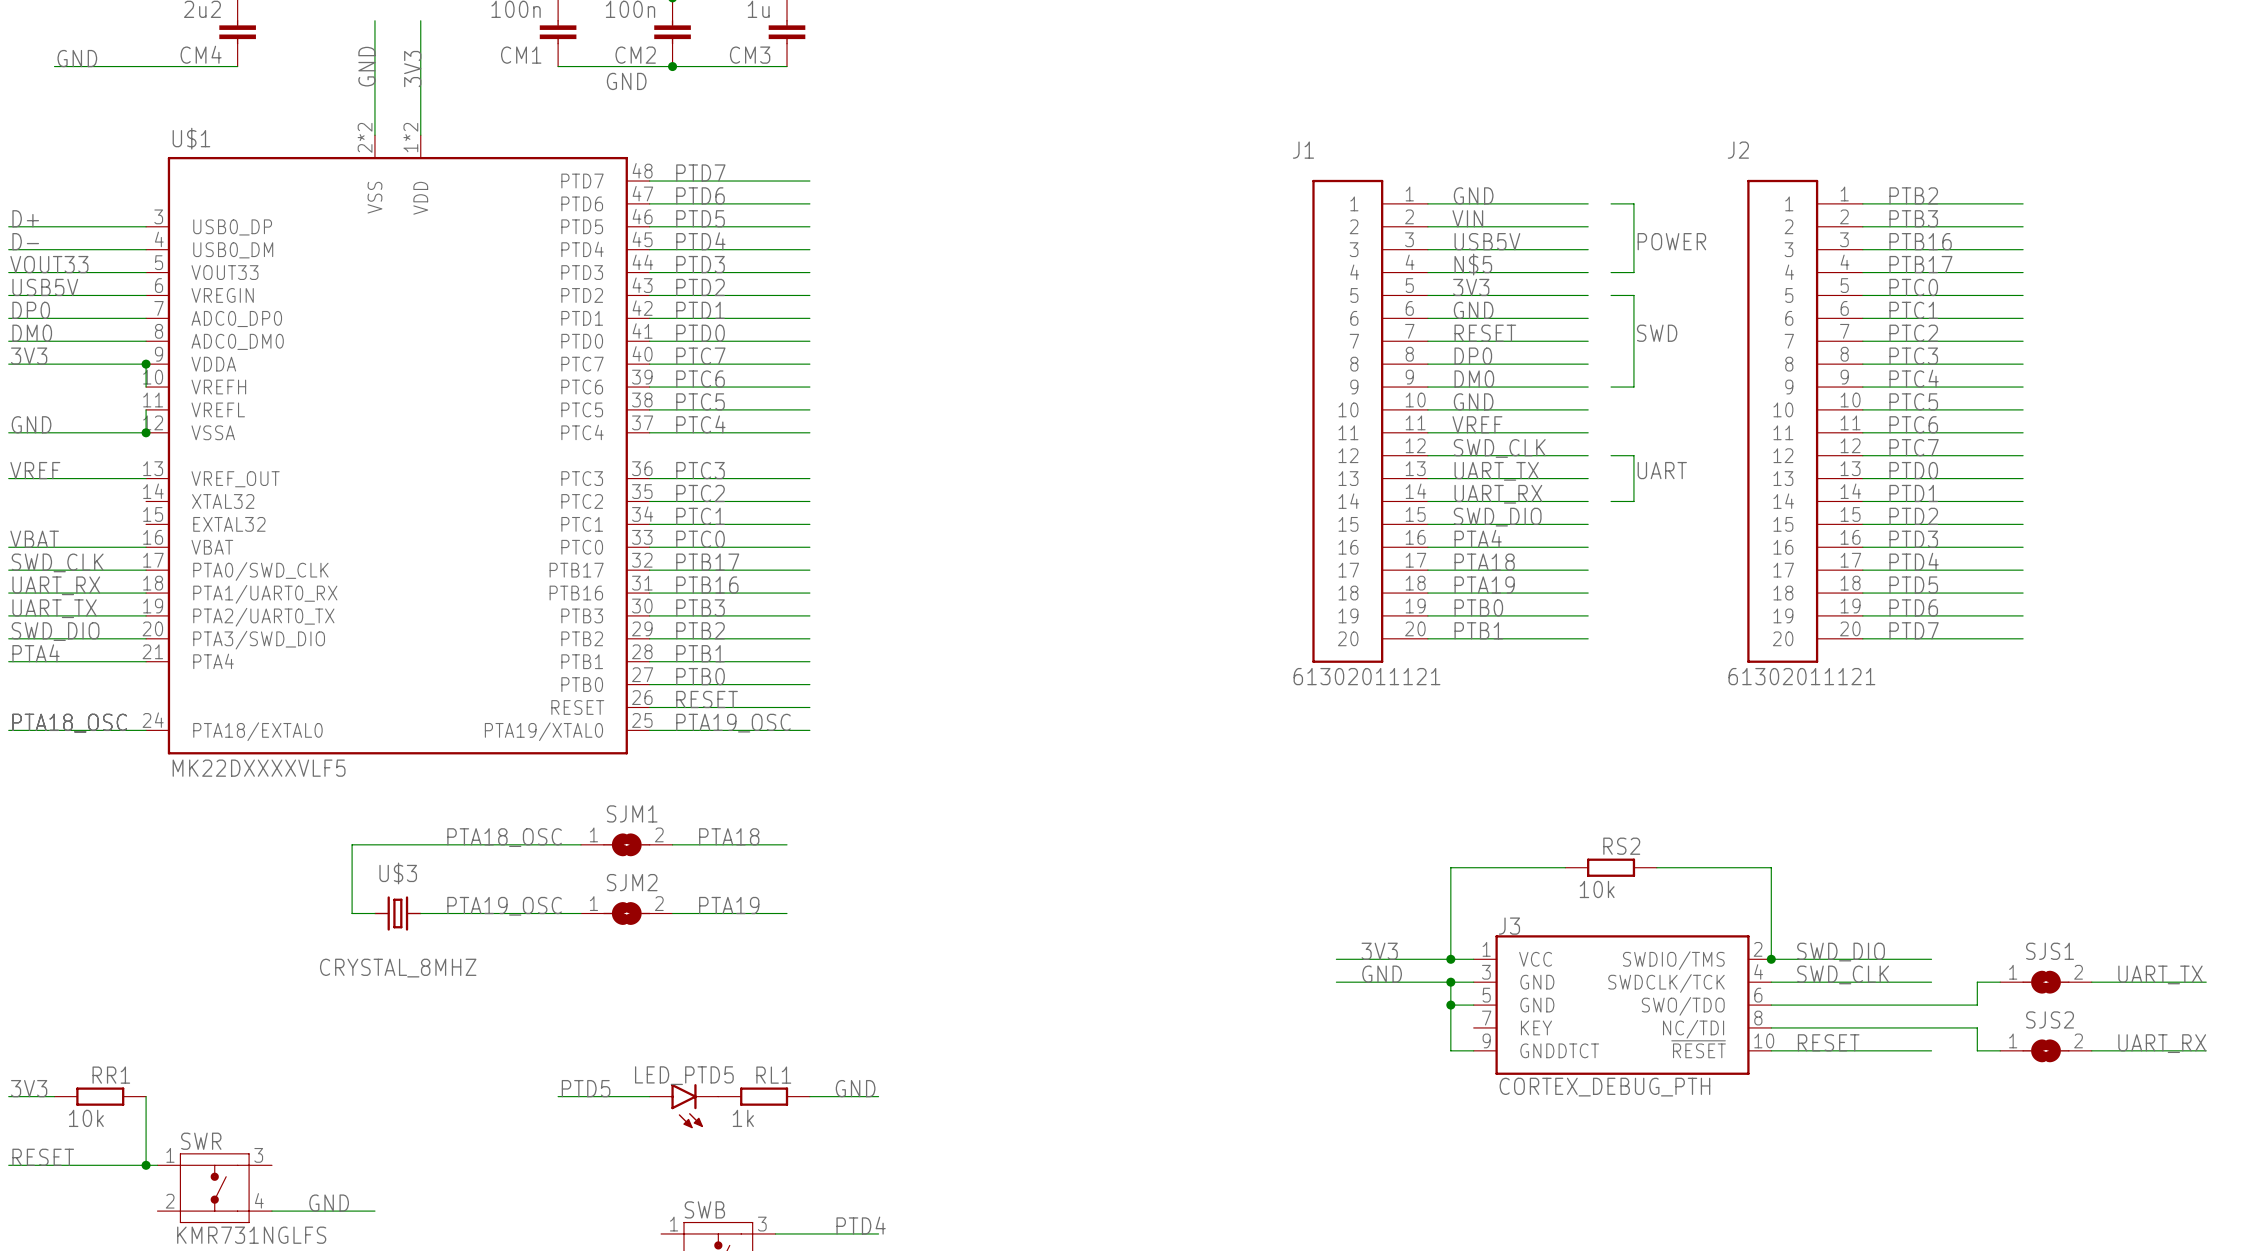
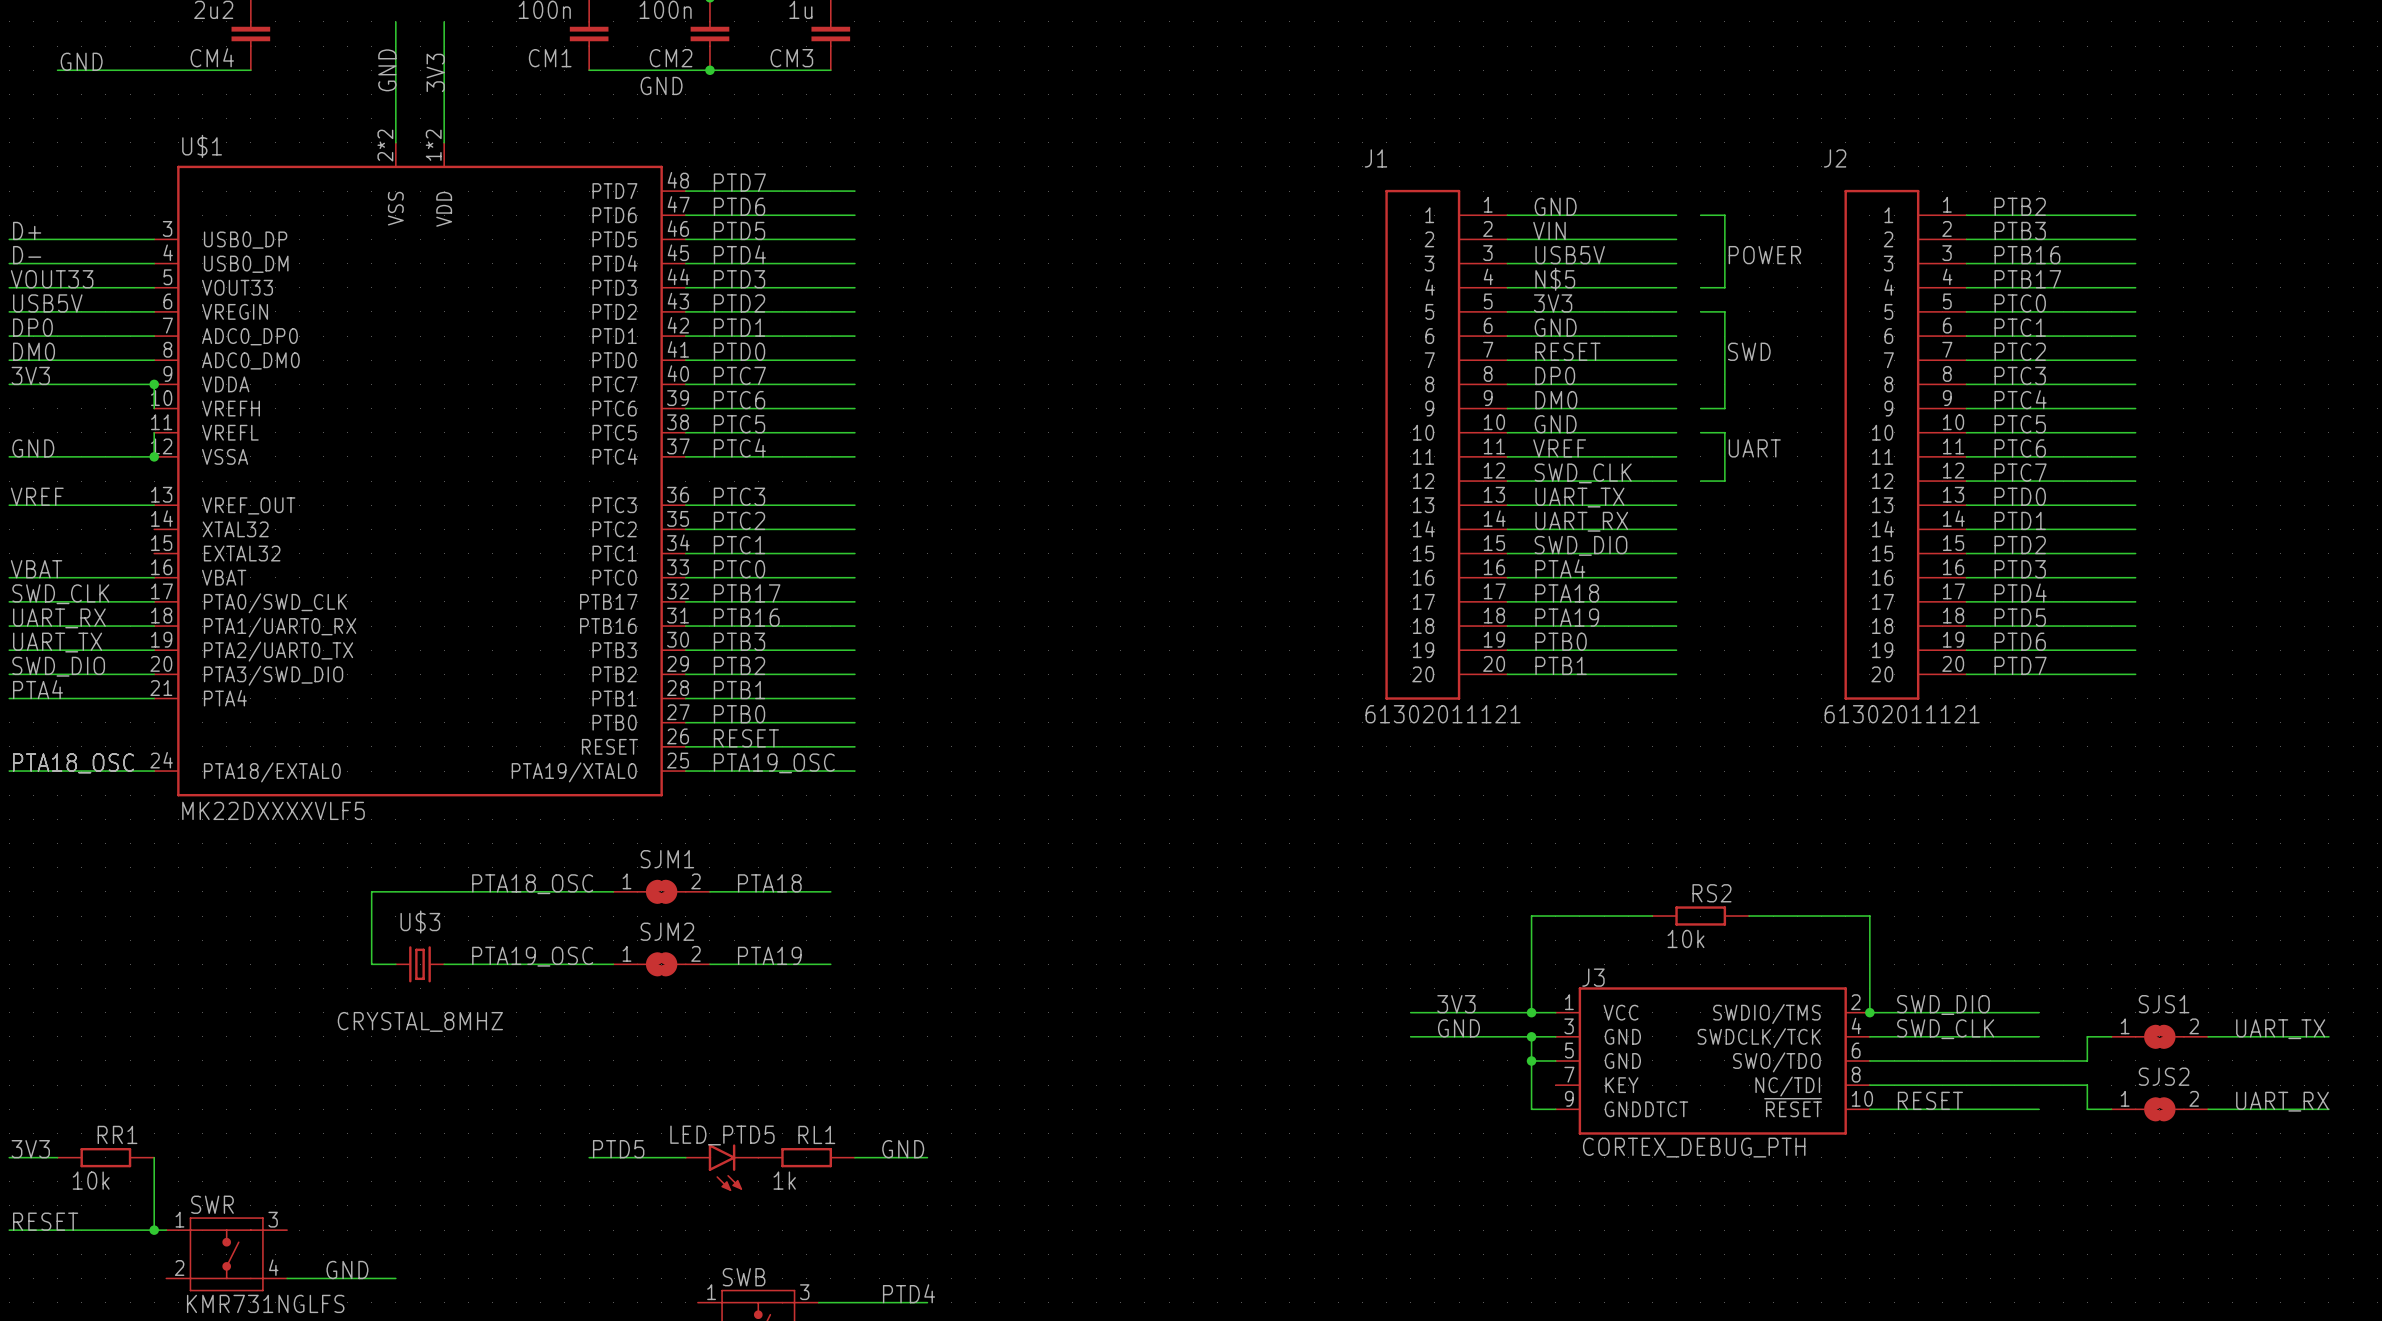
wire: (1633, 455) (1633, 501) (1611, 501) -> (1724, 481) (1724, 432) (1700, 432)
label position: UART (1662, 470) -> UART (1754, 448)

